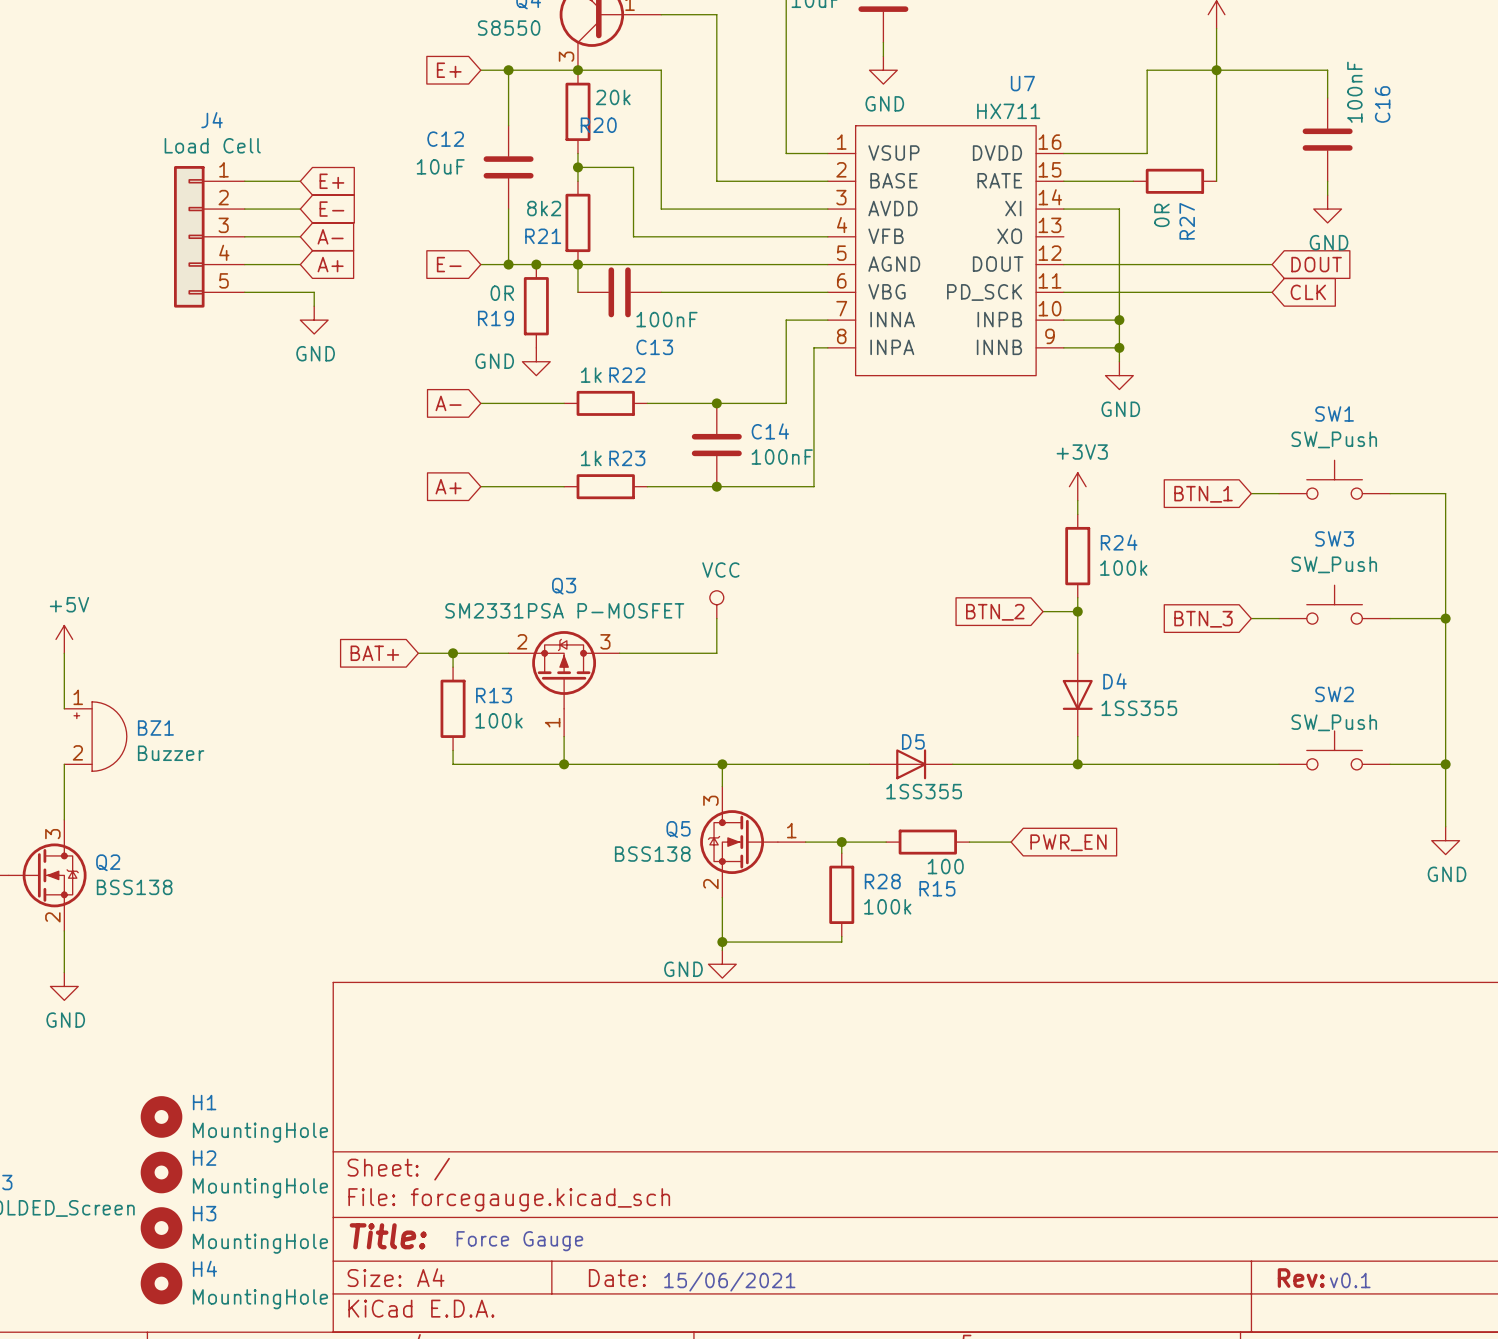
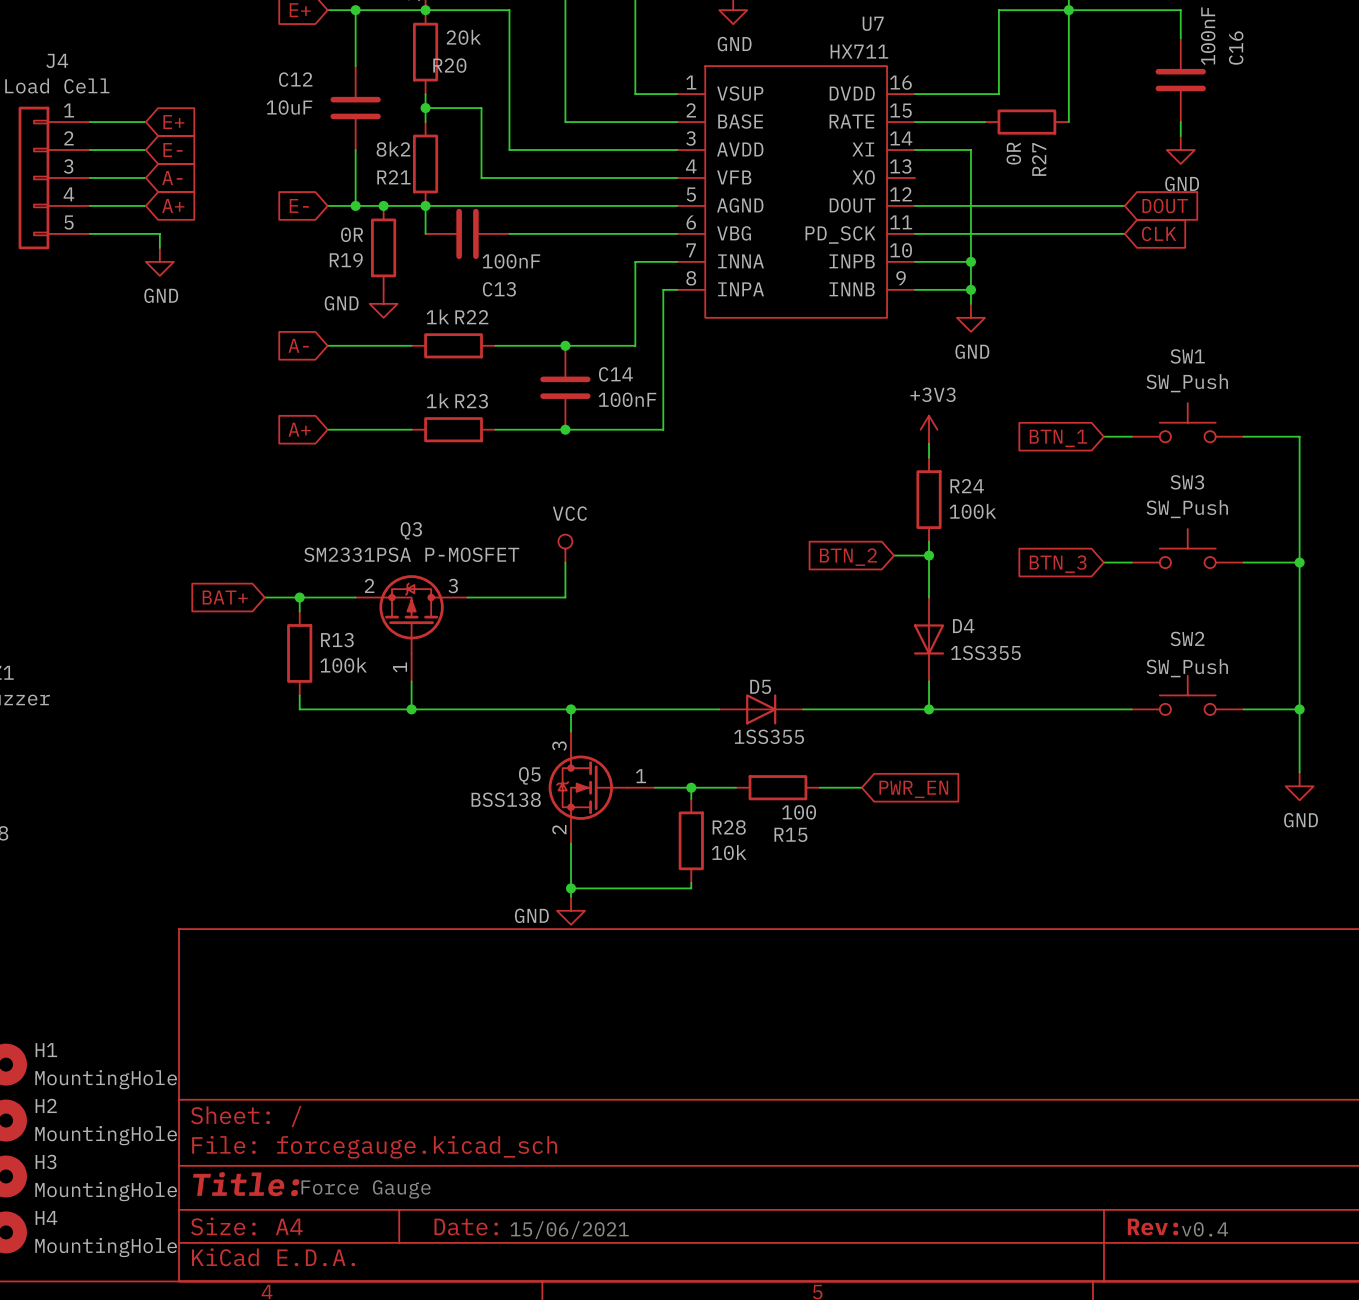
R28 value: 100k (887, 906) -> 10k (729, 852)
text: v0.1 (1350, 1280) -> v0.4 (1205, 1229)

